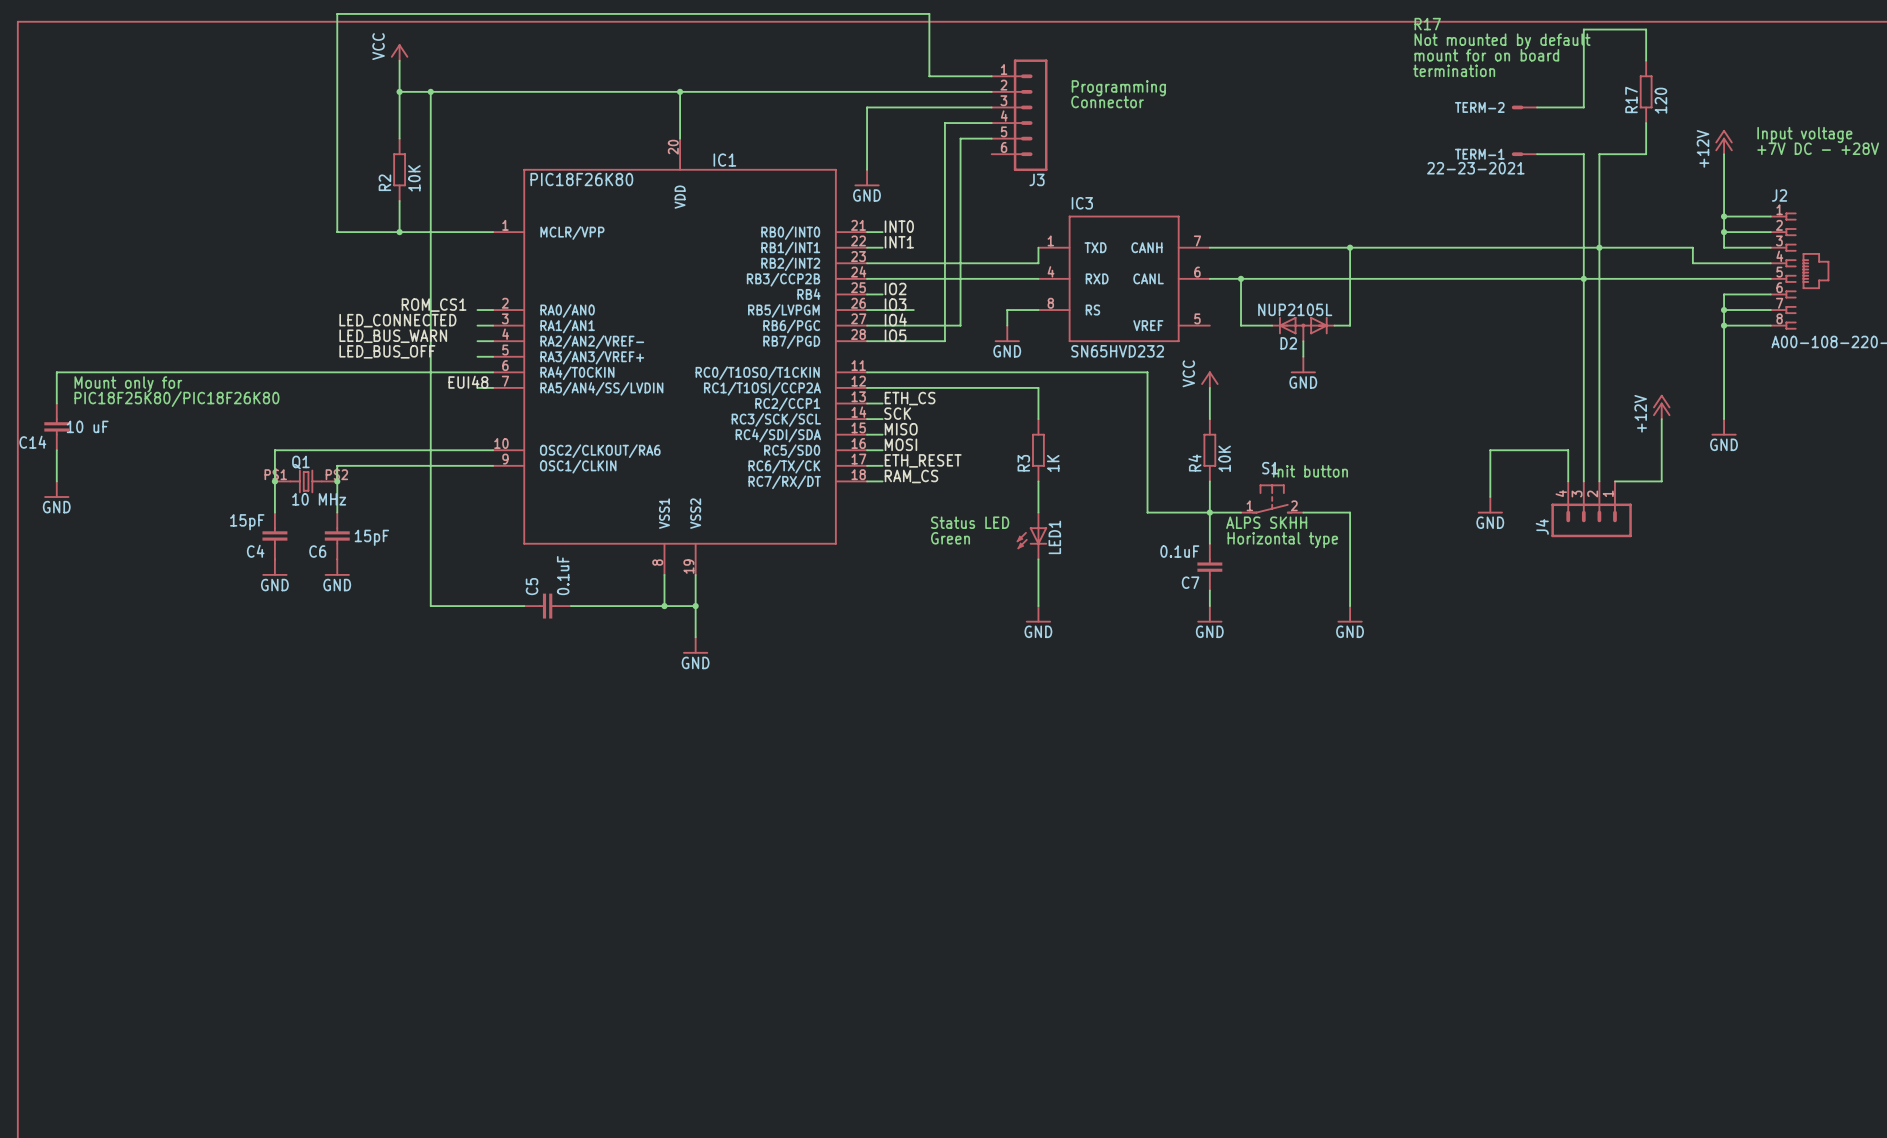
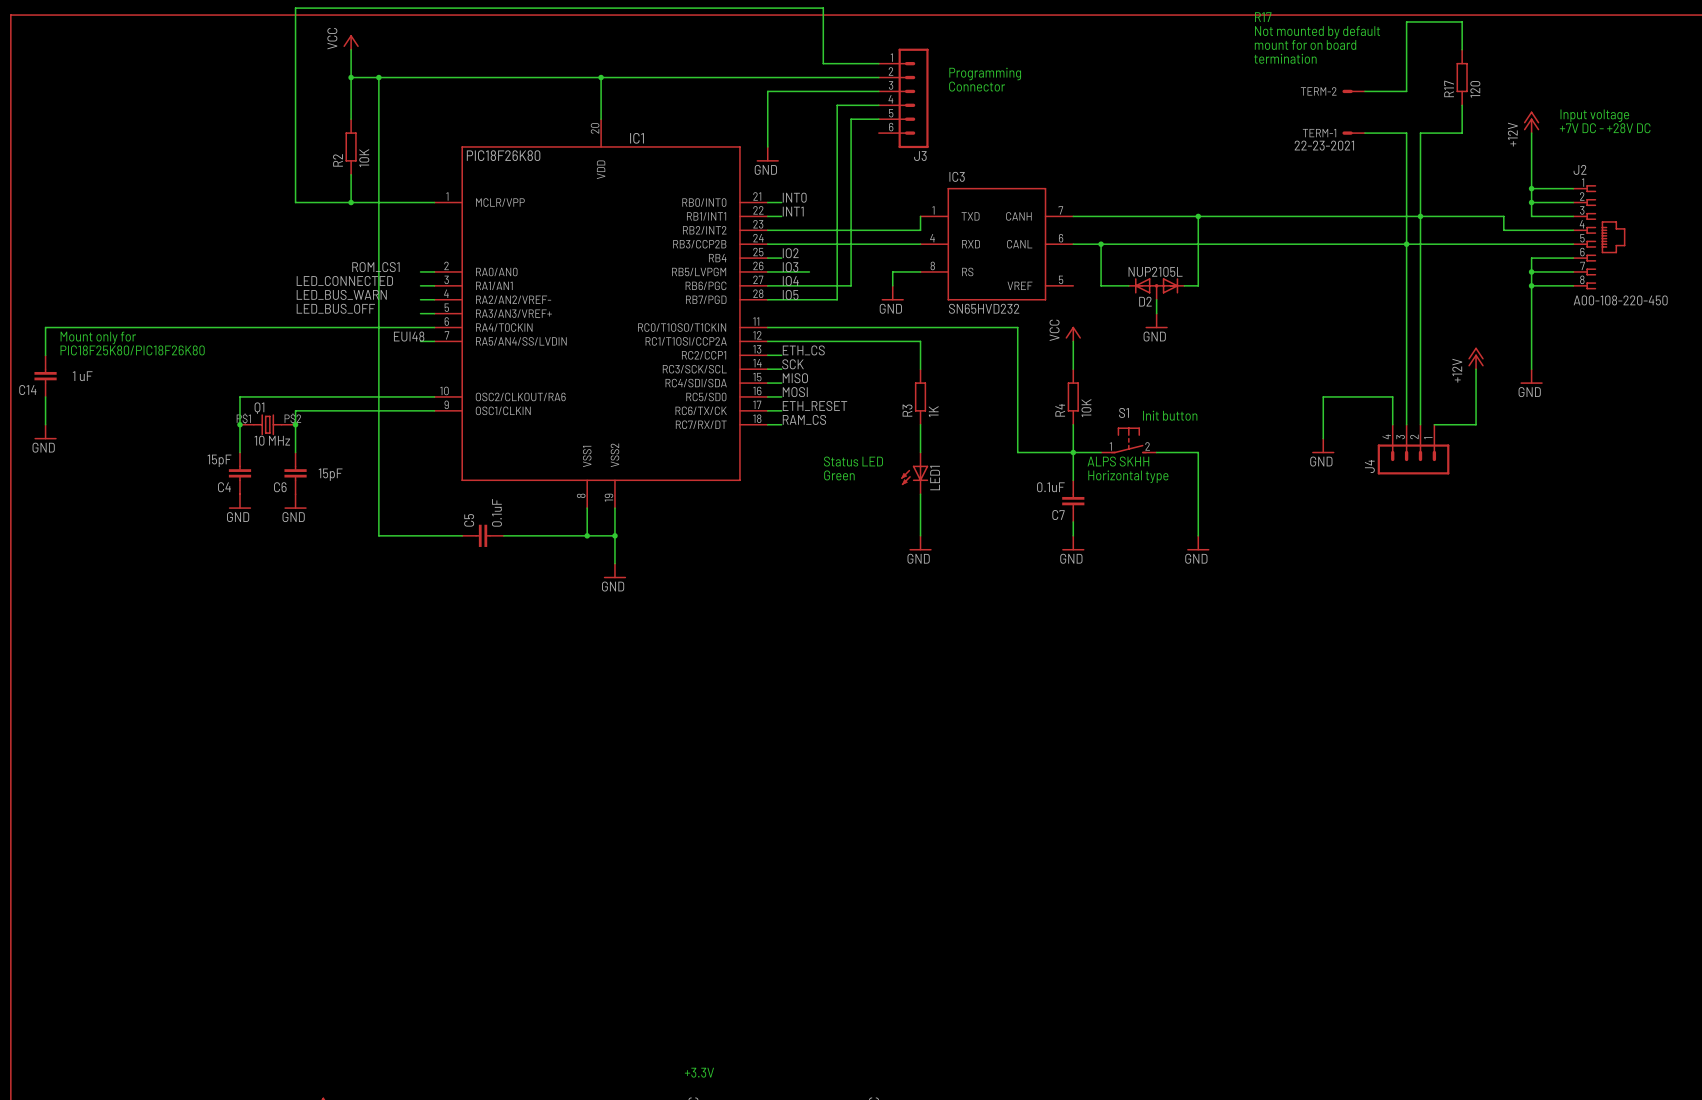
C14 value: 10 uF (87, 426) -> 1 uF (82, 376)

